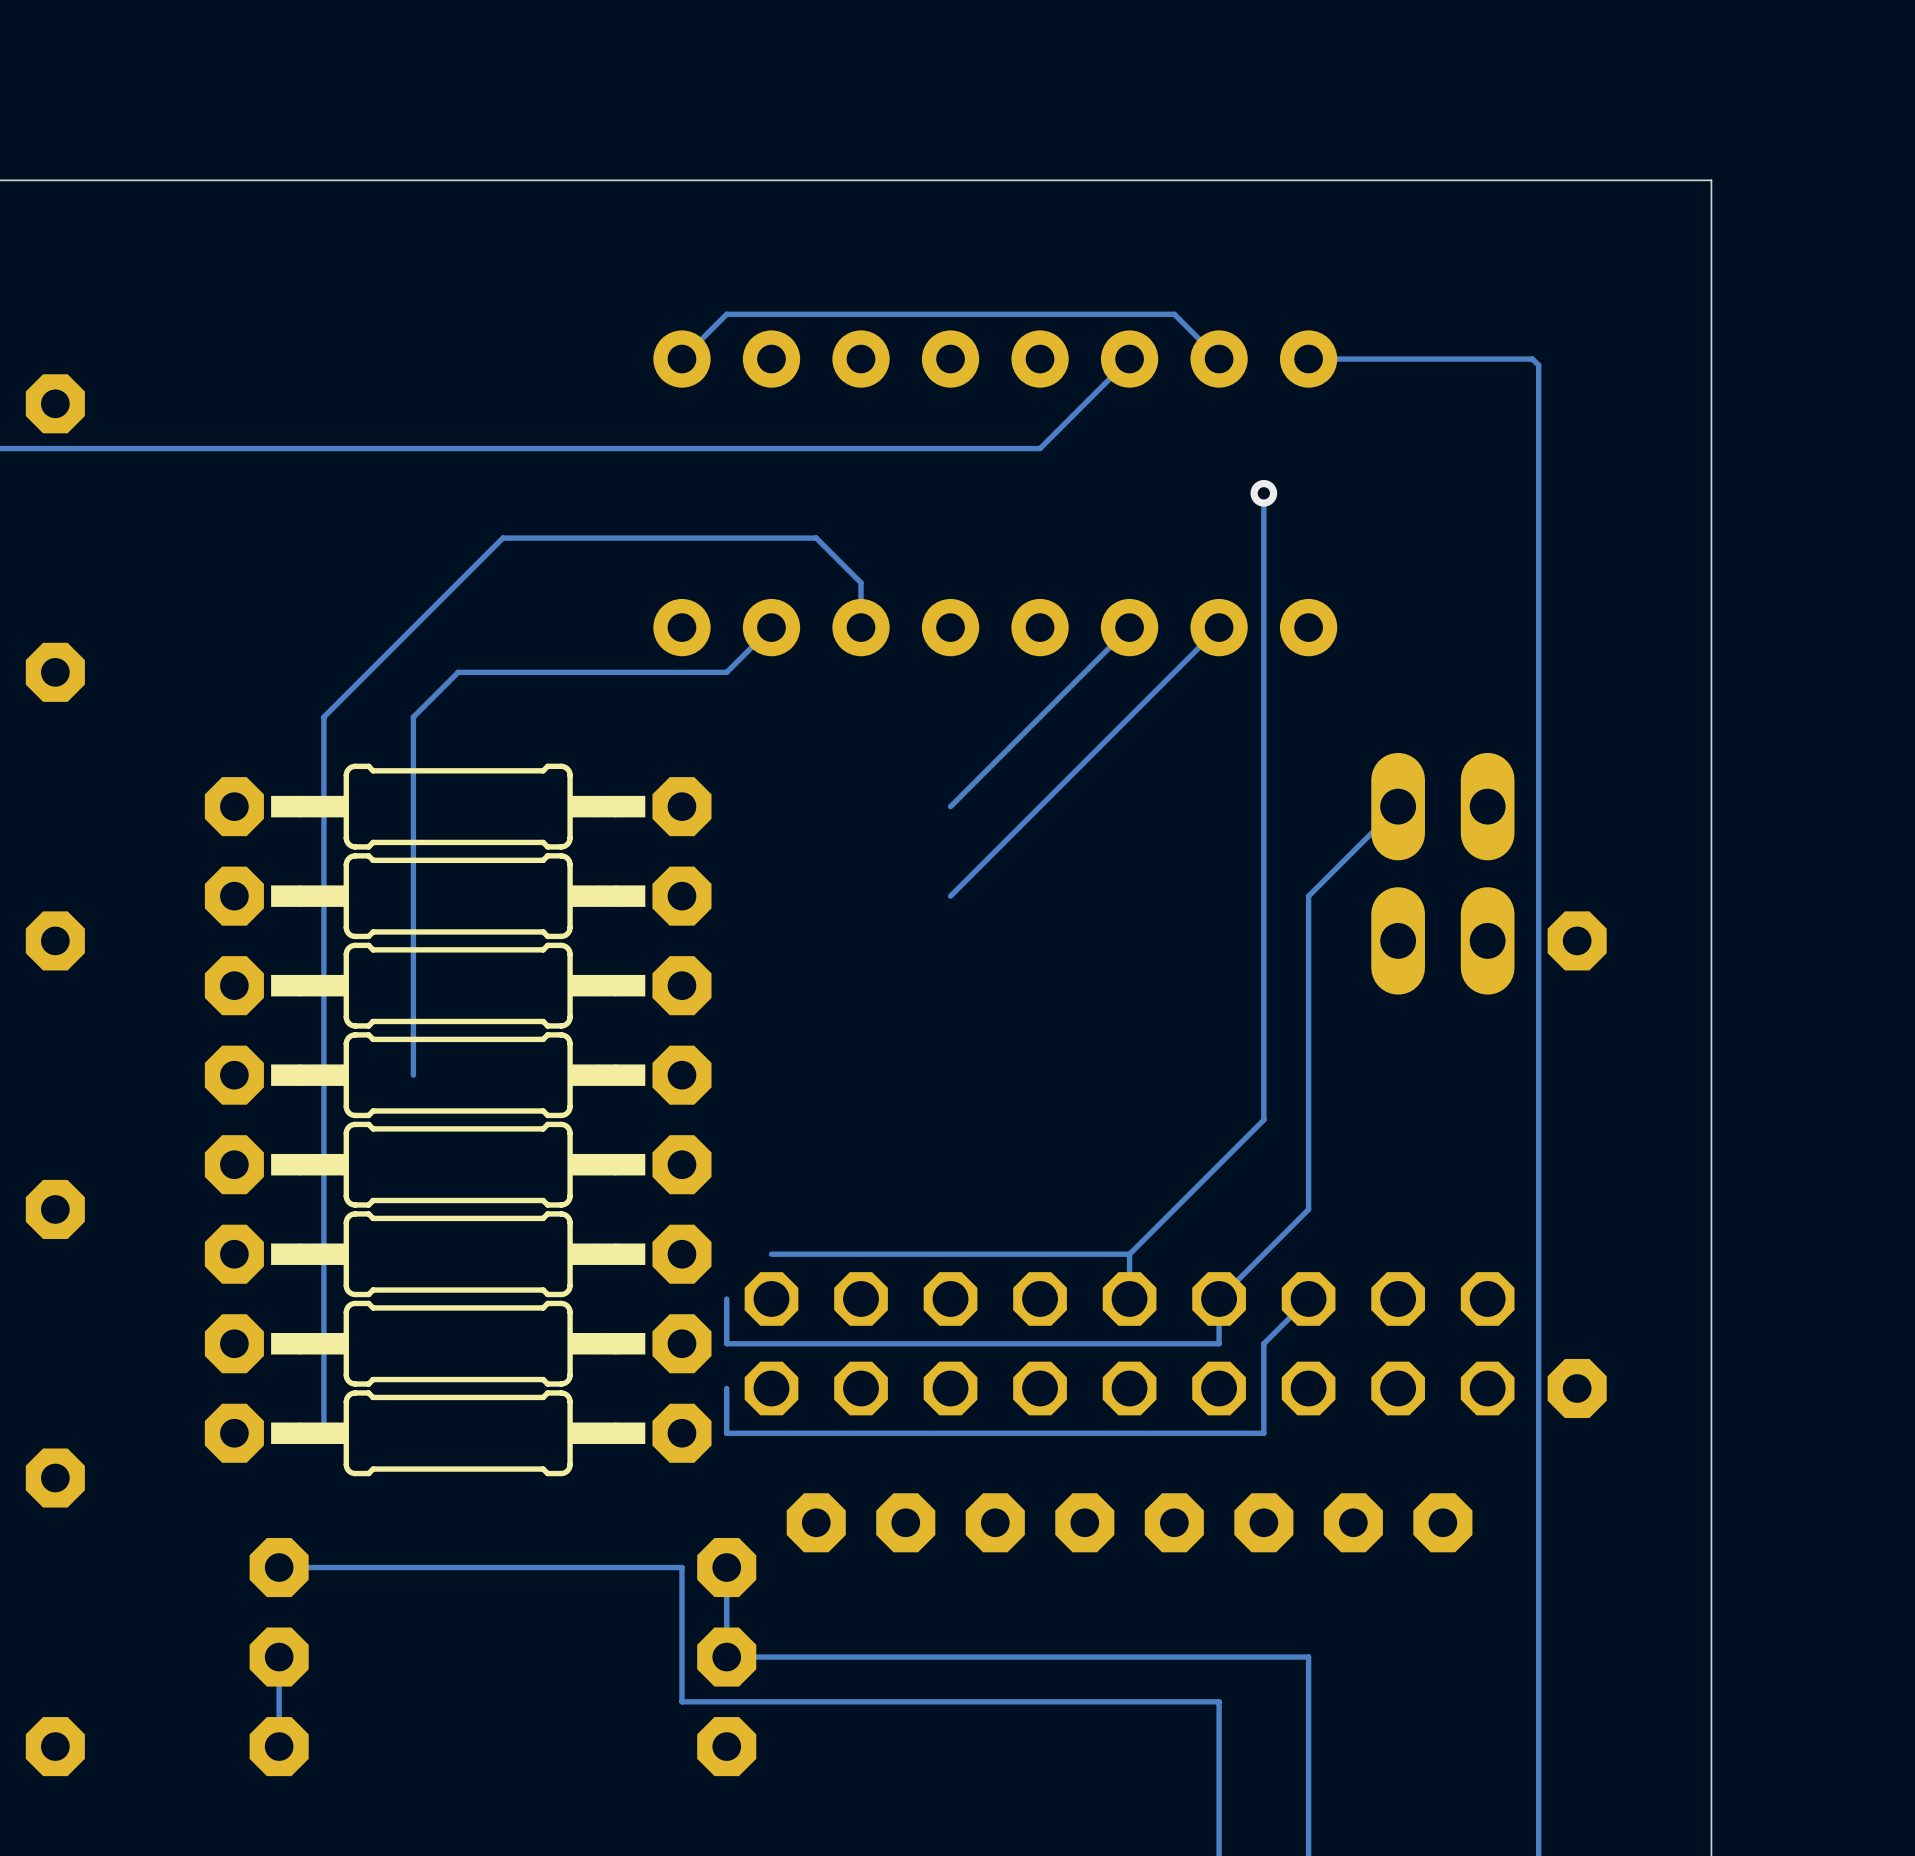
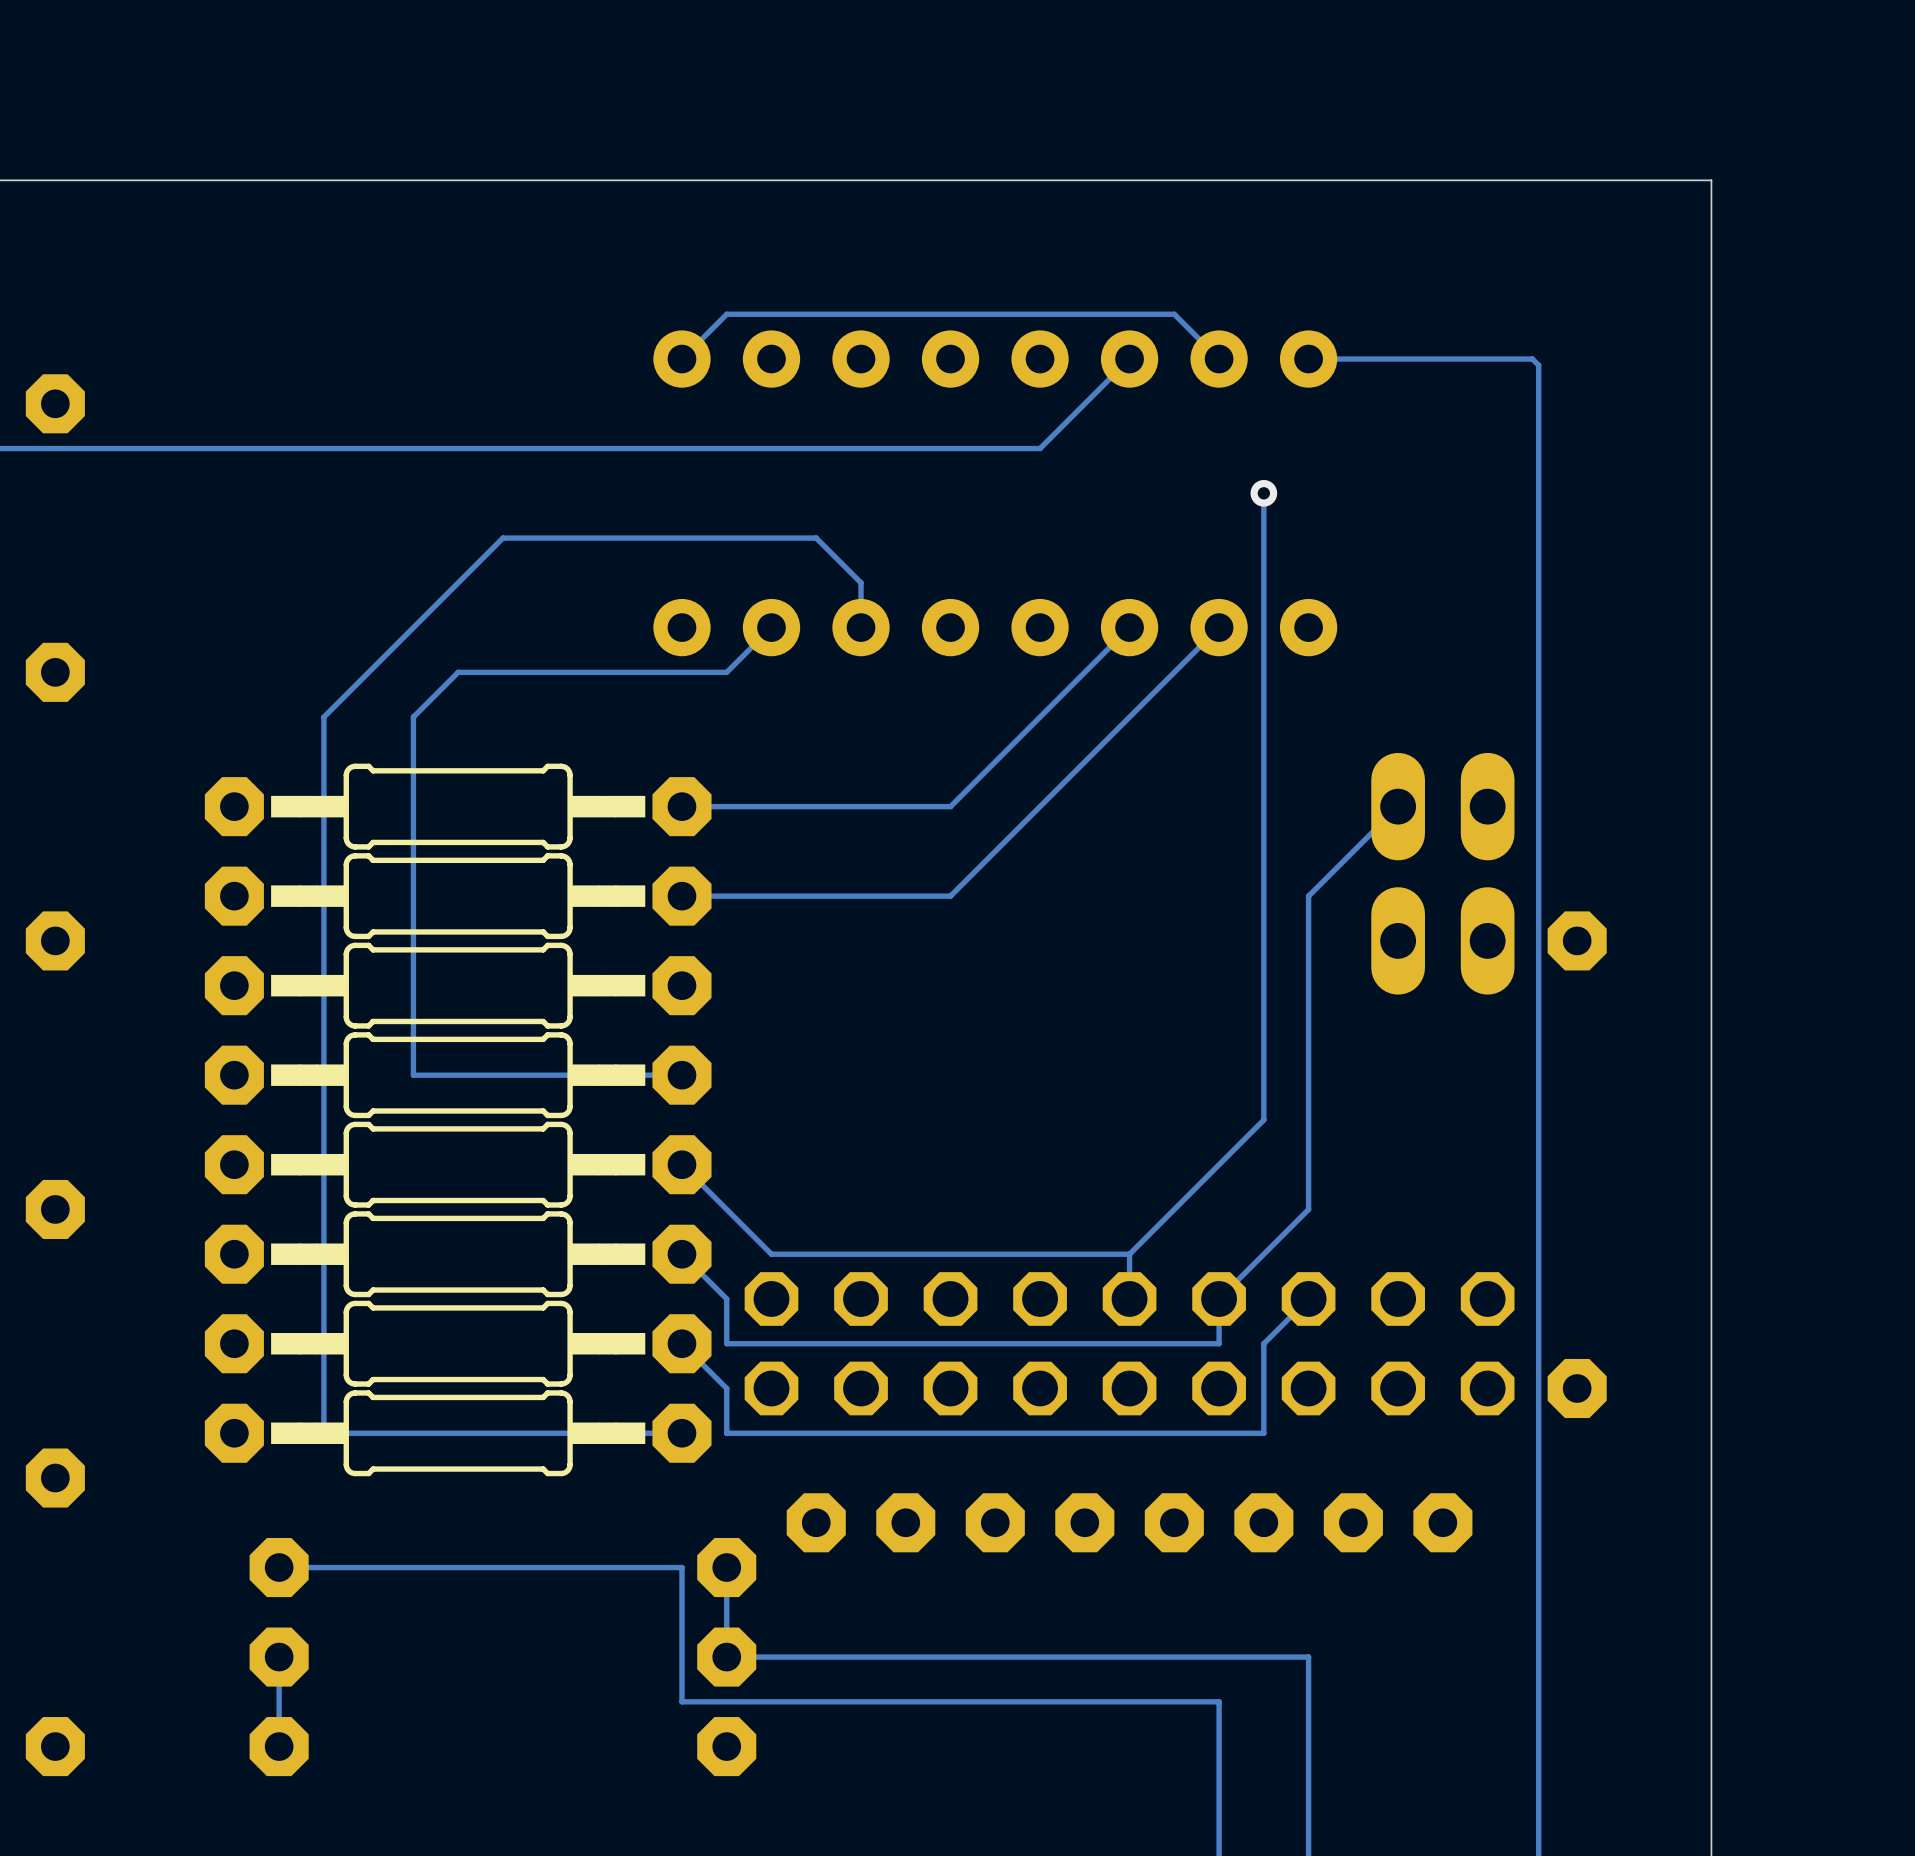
track: none -> (950, 806) (681, 806)
track: none -> (950, 896) (681, 896)
track: none -> (681, 1075) (413, 1075)
track: none -> (681, 1164) (771, 1254)
track: none -> (681, 1254) (726, 1298)
track: none -> (681, 1343) (726, 1388)
track: none -> (681, 1433) (323, 1433)

